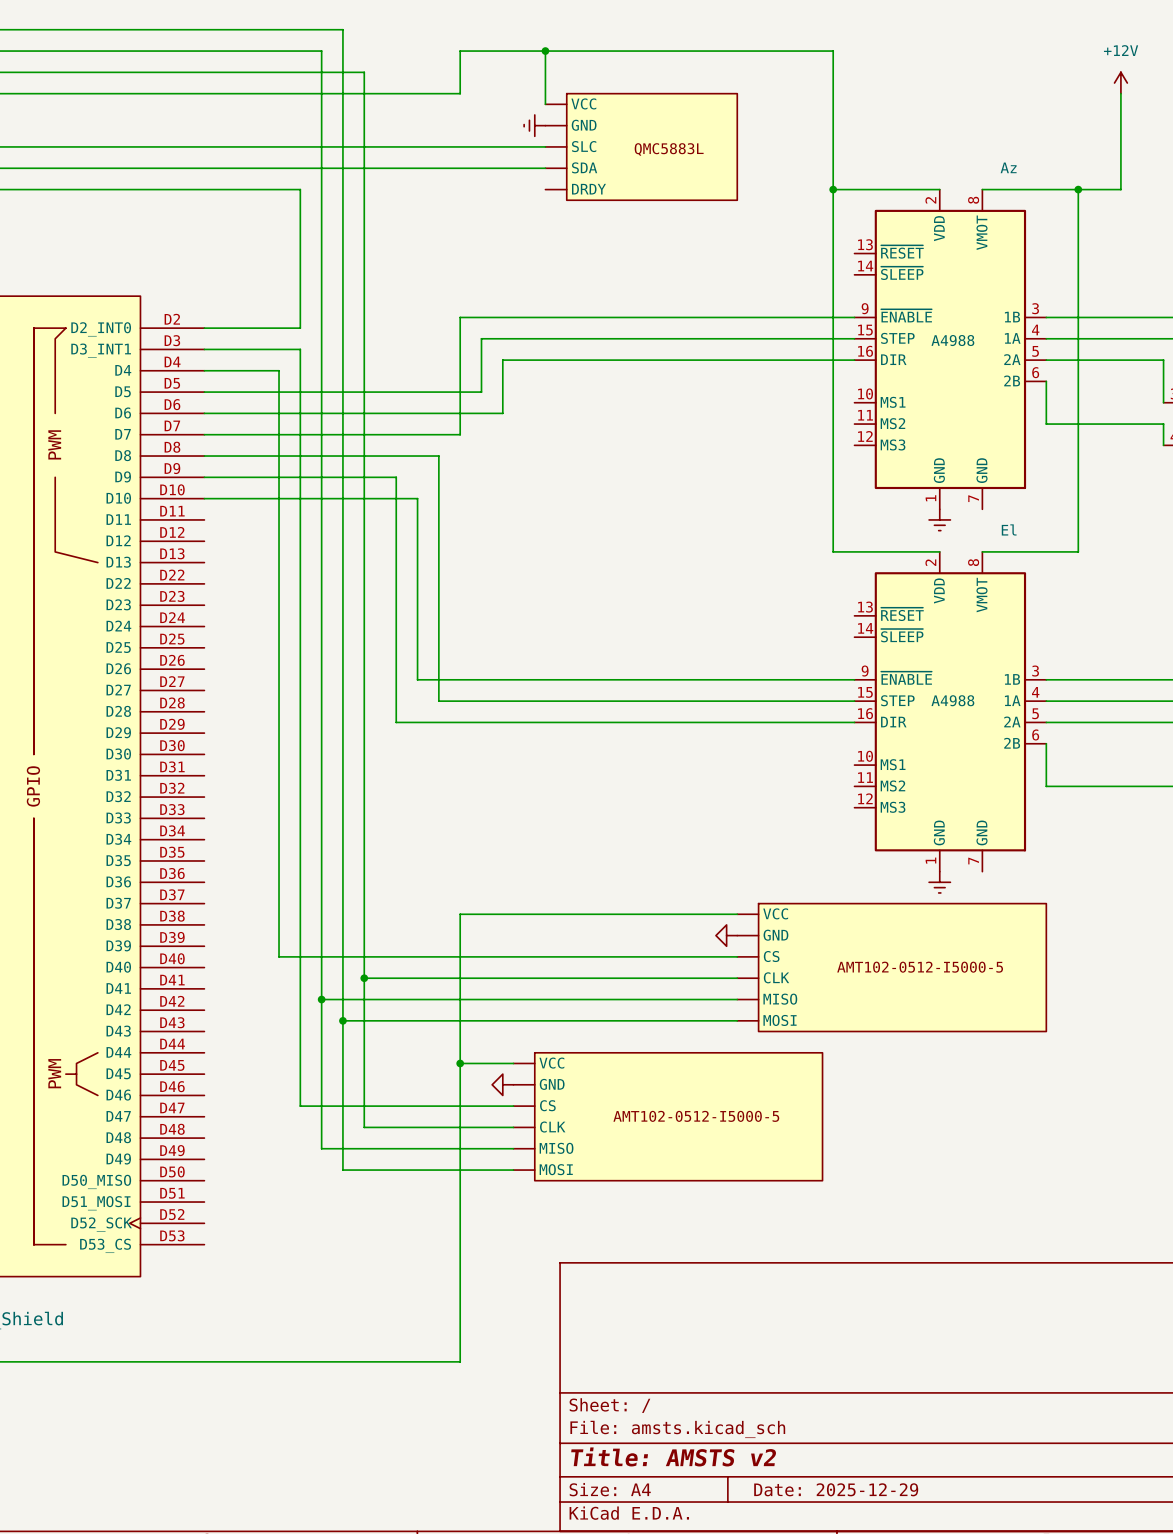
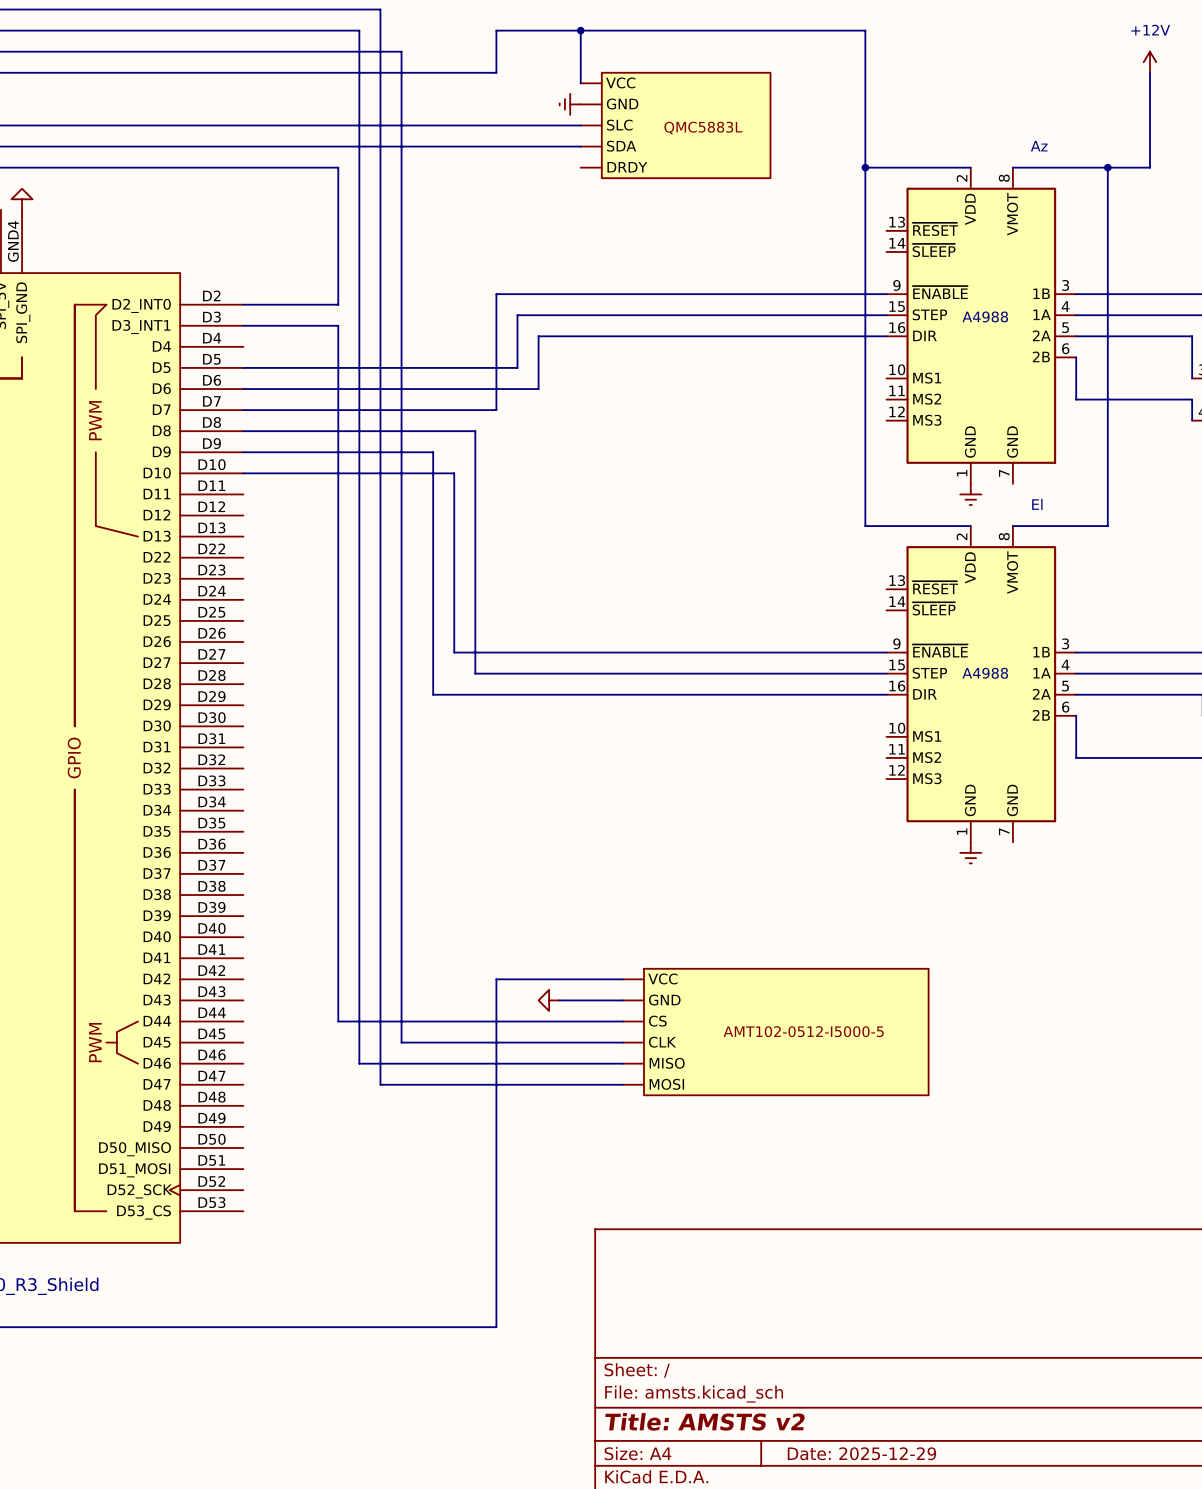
wire: (204, 370) (279, 370) (279, 956) (737, 956) -> none
wire: (737, 914) (460, 914) (460, 1010) -> (622, 979) (496, 979)
power symbol: (726, 935) -> none
part: (891, 967) -> none
wire: (364, 978) (737, 978) -> none
junction: (364, 978) -> none
wire: (321, 999) (737, 999) -> none
junction: (321, 999) -> none
wire: (342, 1020) (737, 1020) -> none
junction: (342, 1020) -> none
wire: none -> (559, 1000) (622, 1000)
wire: (300, 1052) (300, 1106) (513, 1106) -> (338, 1021) (622, 1021)
wire: (460, 1063) (513, 1063) -> none
junction: (460, 1063) -> none
part: none -> (775, 1032)
wire: (364, 1074) (364, 1127) (513, 1127) -> (401, 1042) (622, 1042)
power symbol position: (502, 1084) -> (549, 1000)
wire: (321, 1095) (321, 1148) (513, 1148) -> (359, 1063) (622, 1063)
wire: (342, 1116) (342, 1170) (513, 1170) -> (380, 1084) (622, 1084)
part: (668, 1116) -> none

